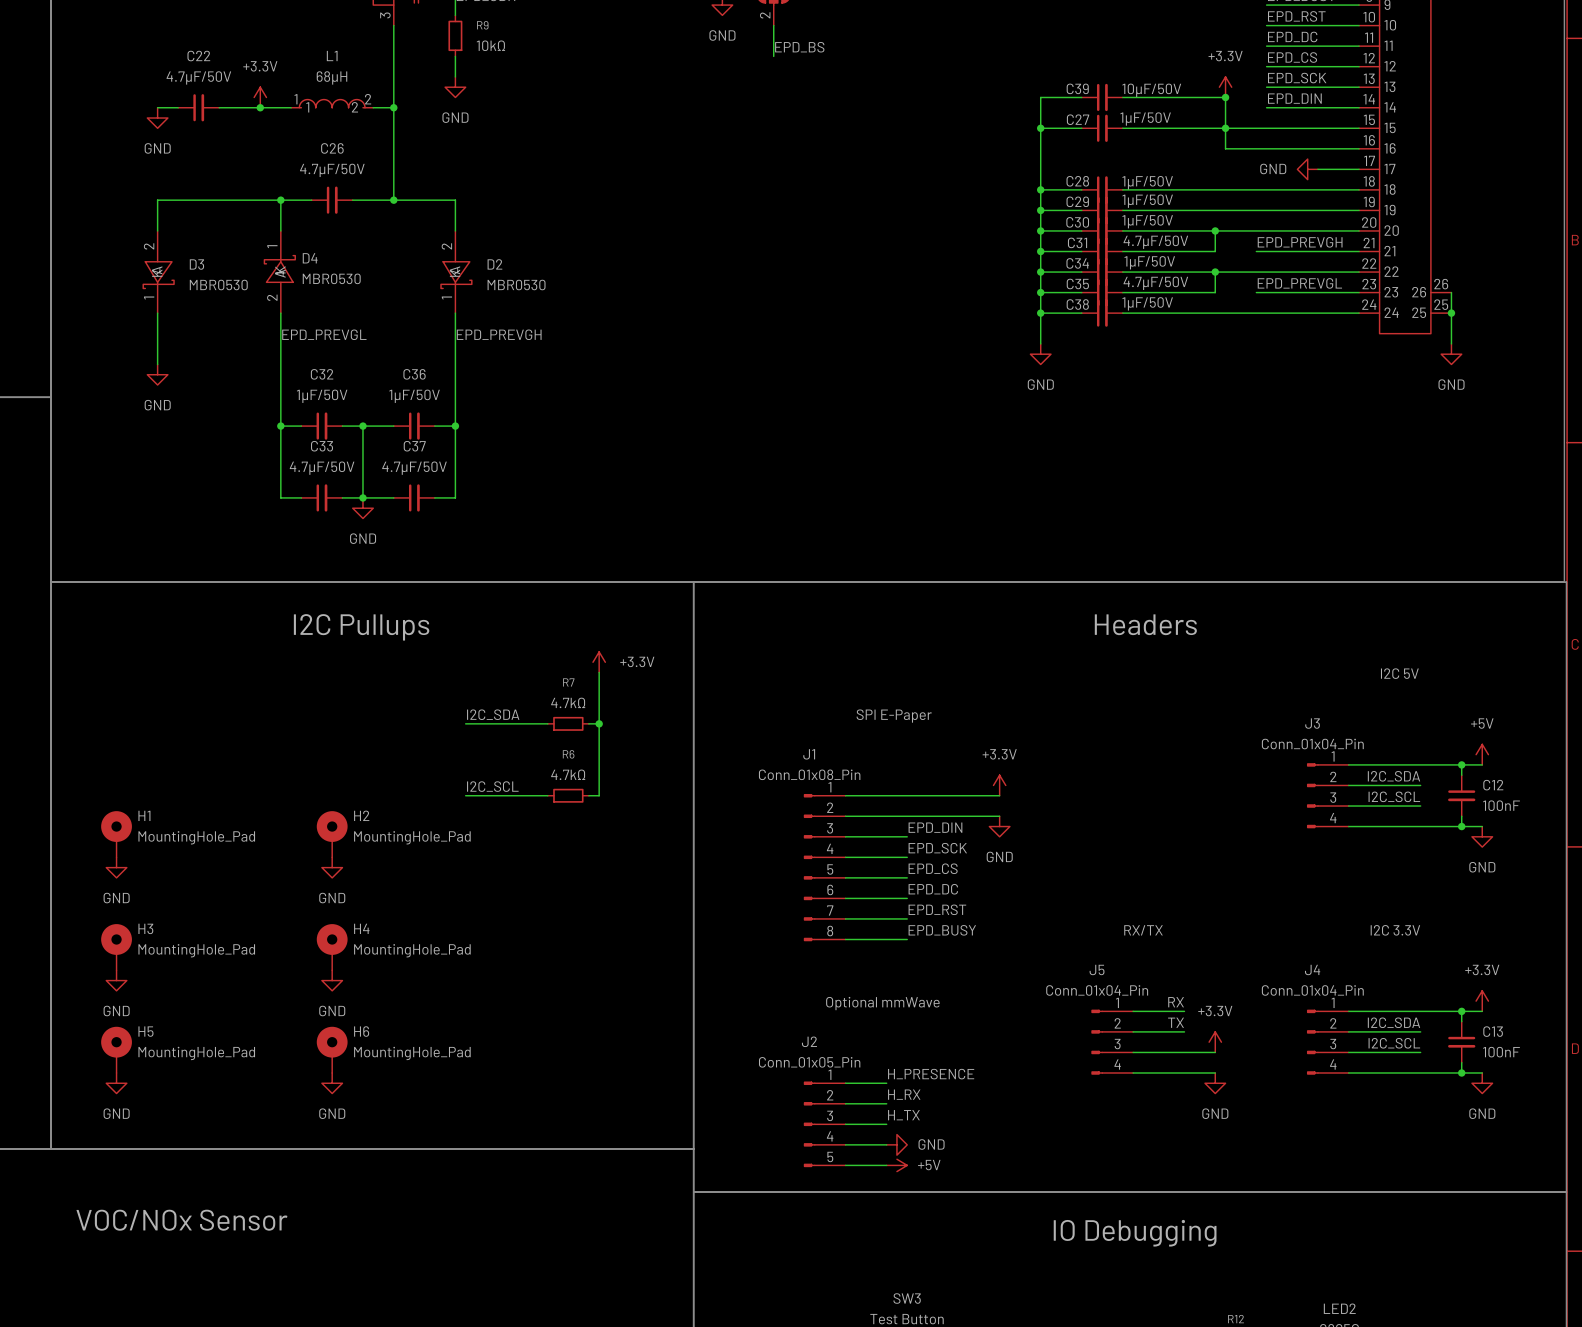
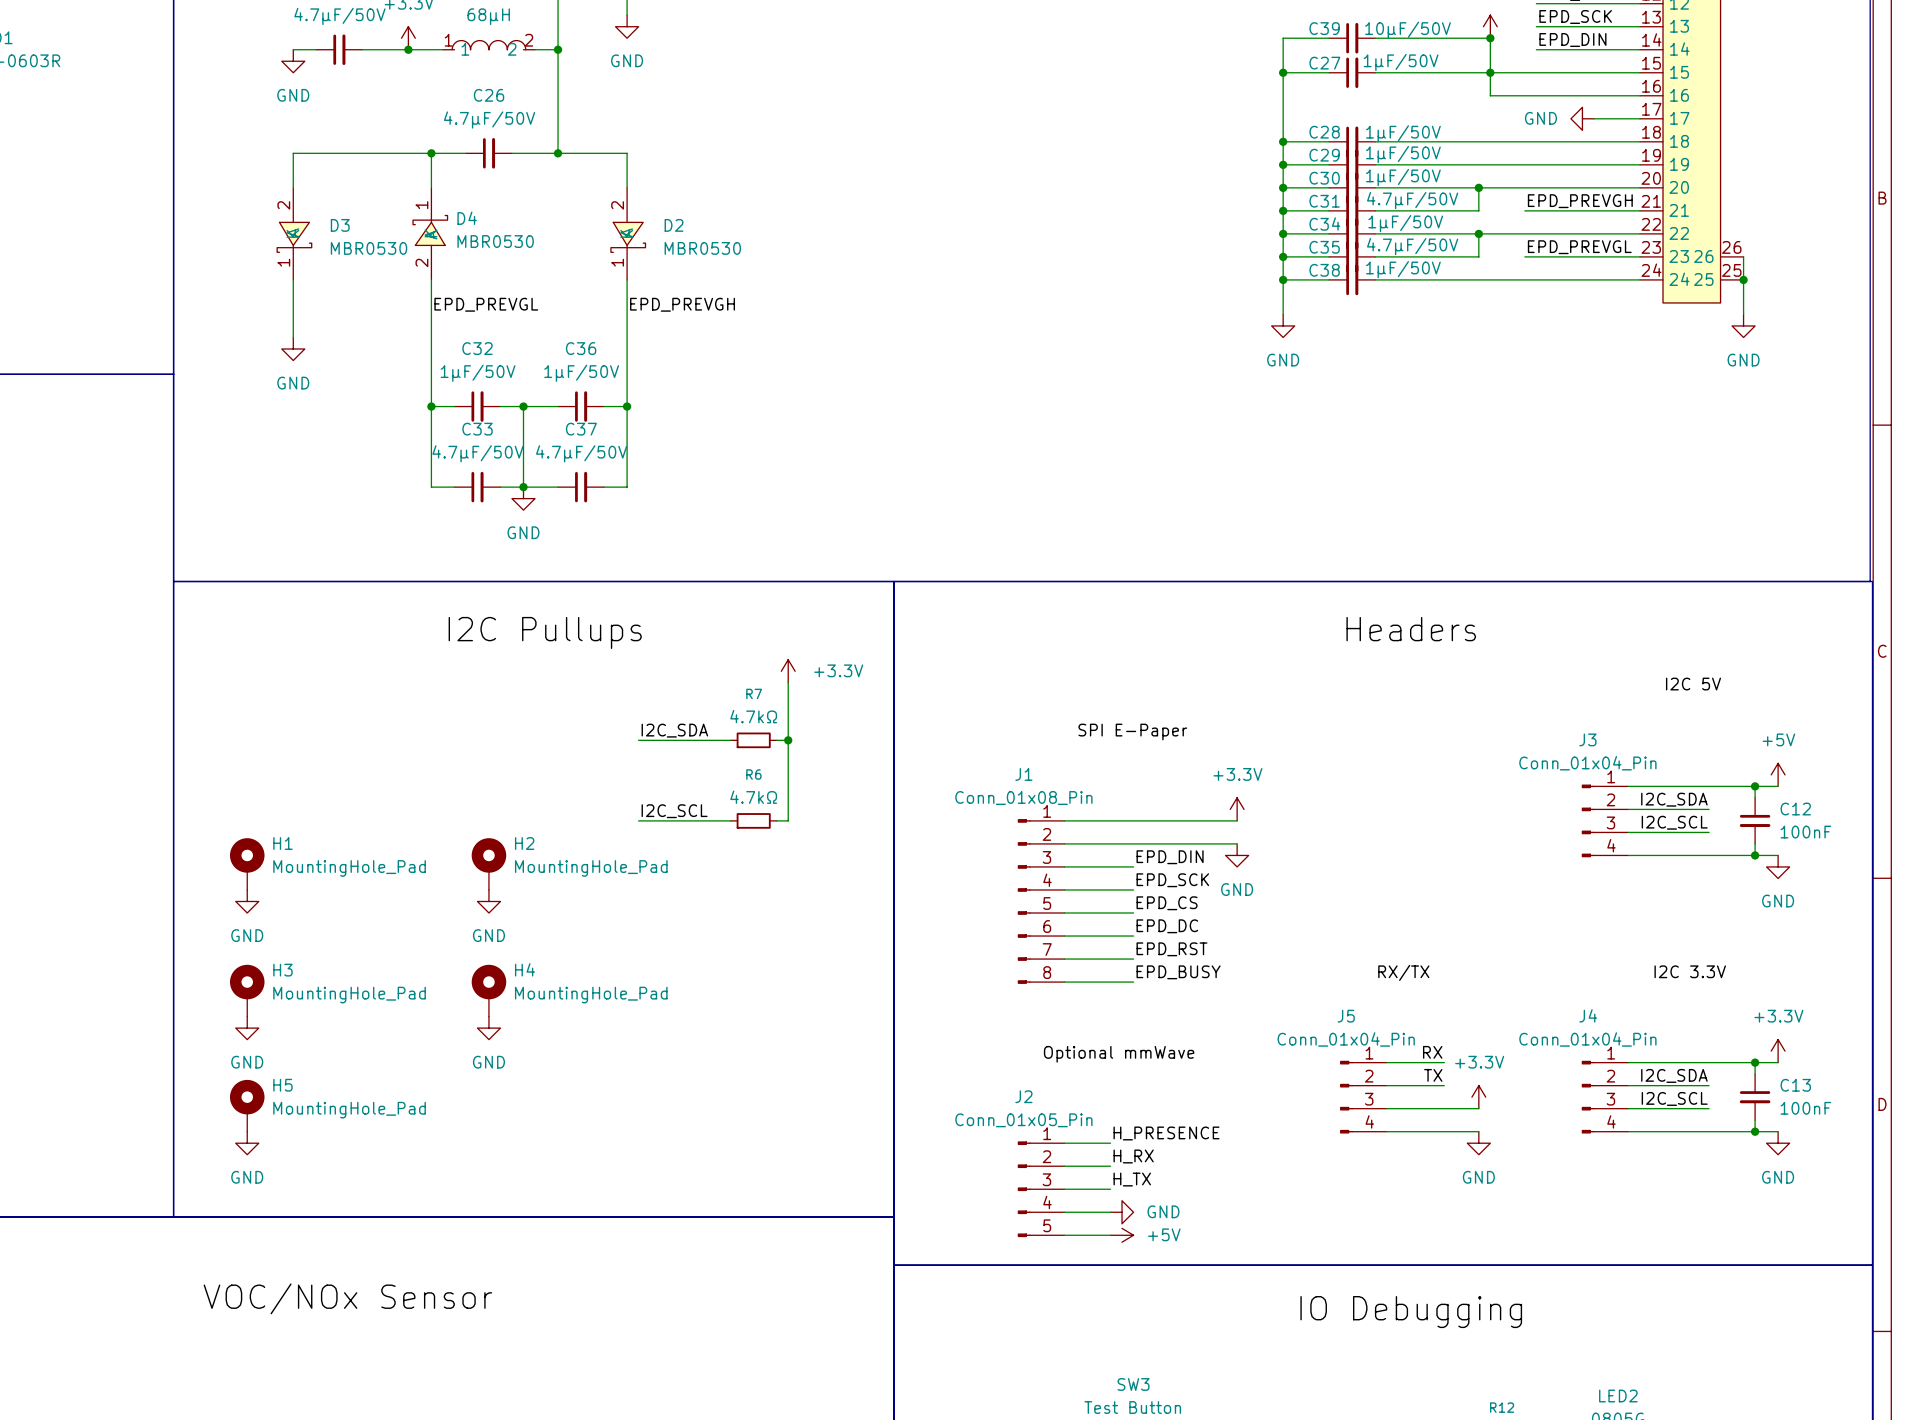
H6: MountingHole_Pad (332, 1049) -> none
power symbol: GND (332, 1083) -> none

